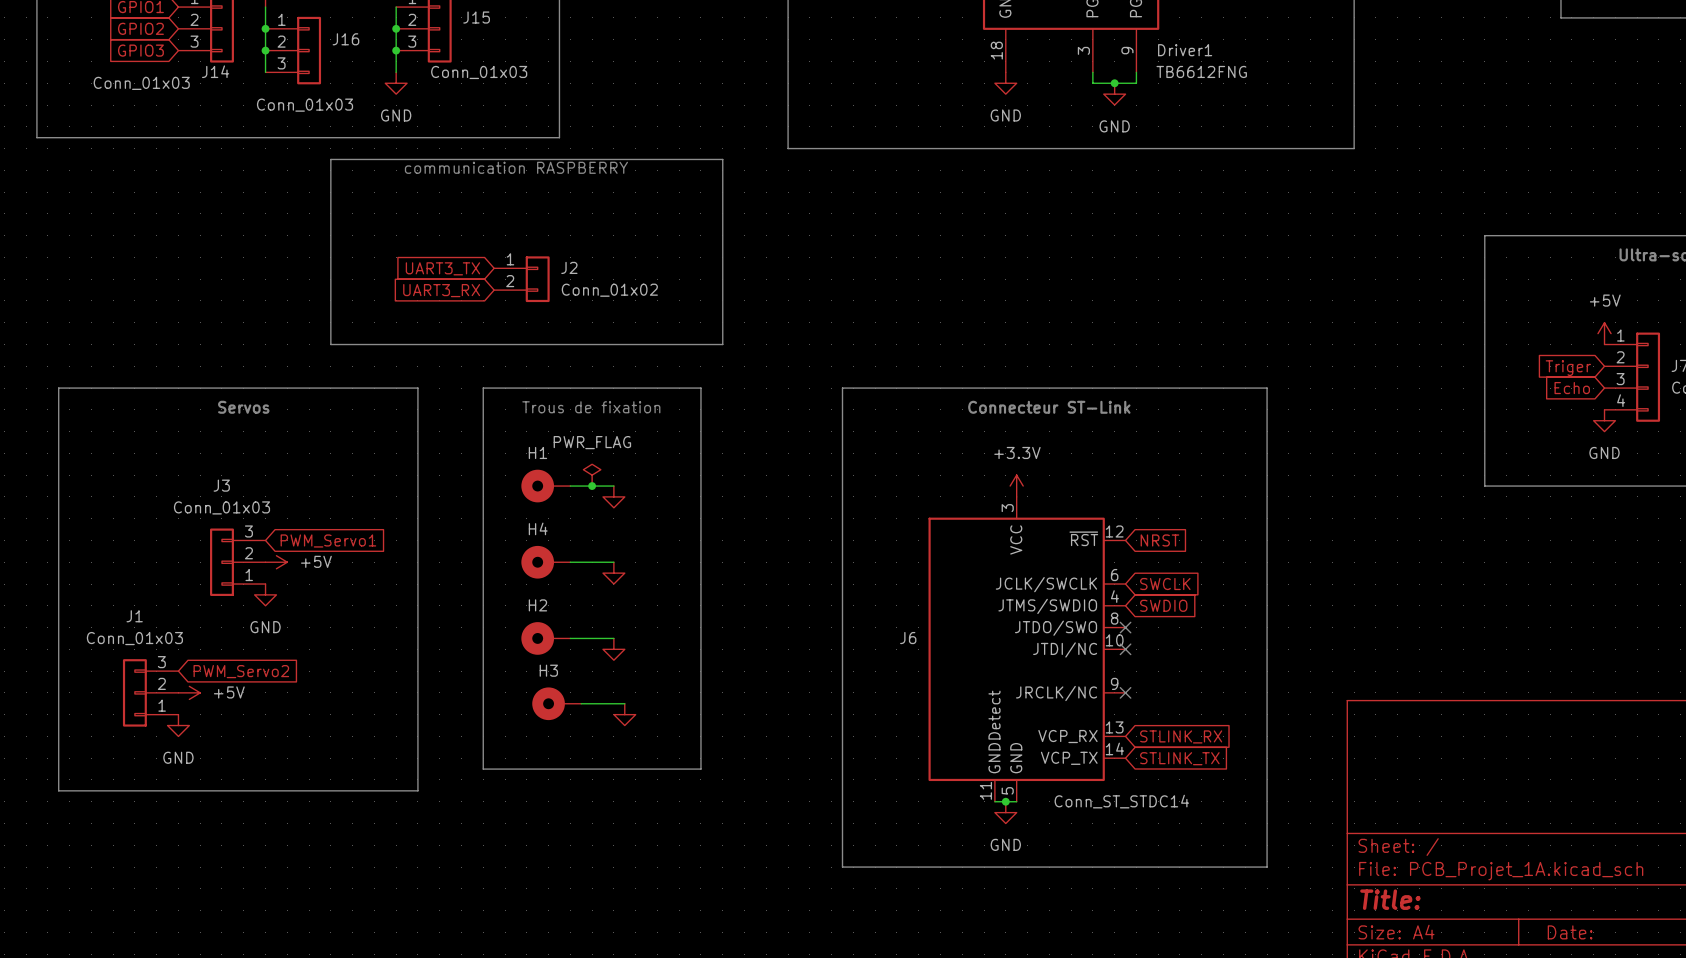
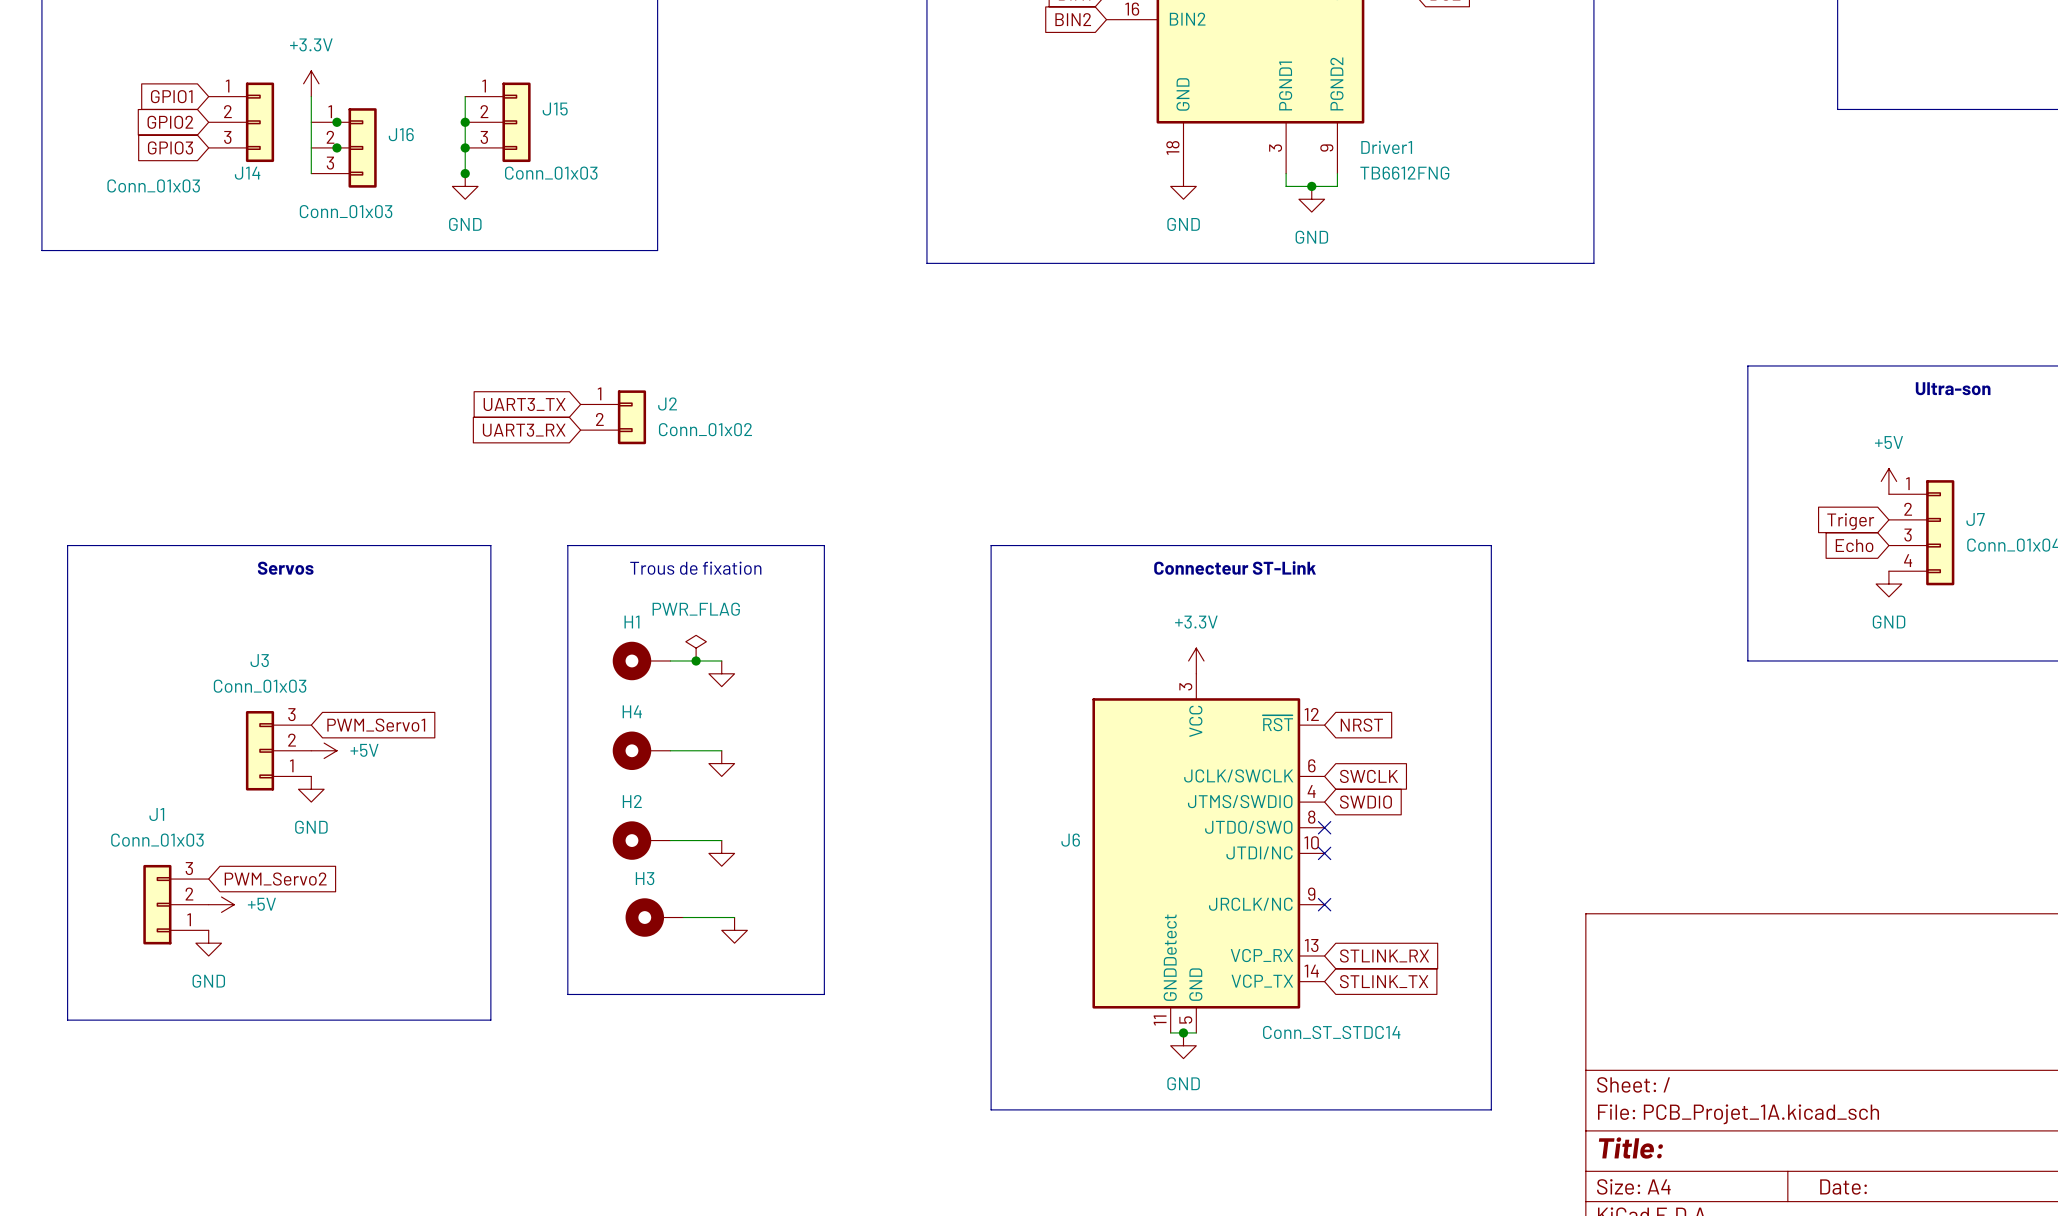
junction: (265, 28) -> none
junction: none -> (336, 122)
junction: (265, 50) -> none
junction: none -> (336, 147)
junction: none -> (465, 173)
line: (330, 159) (722, 159) (722, 344) (330, 344) (330, 159) -> none
text: communication RASPBERRY (516, 167) -> none

